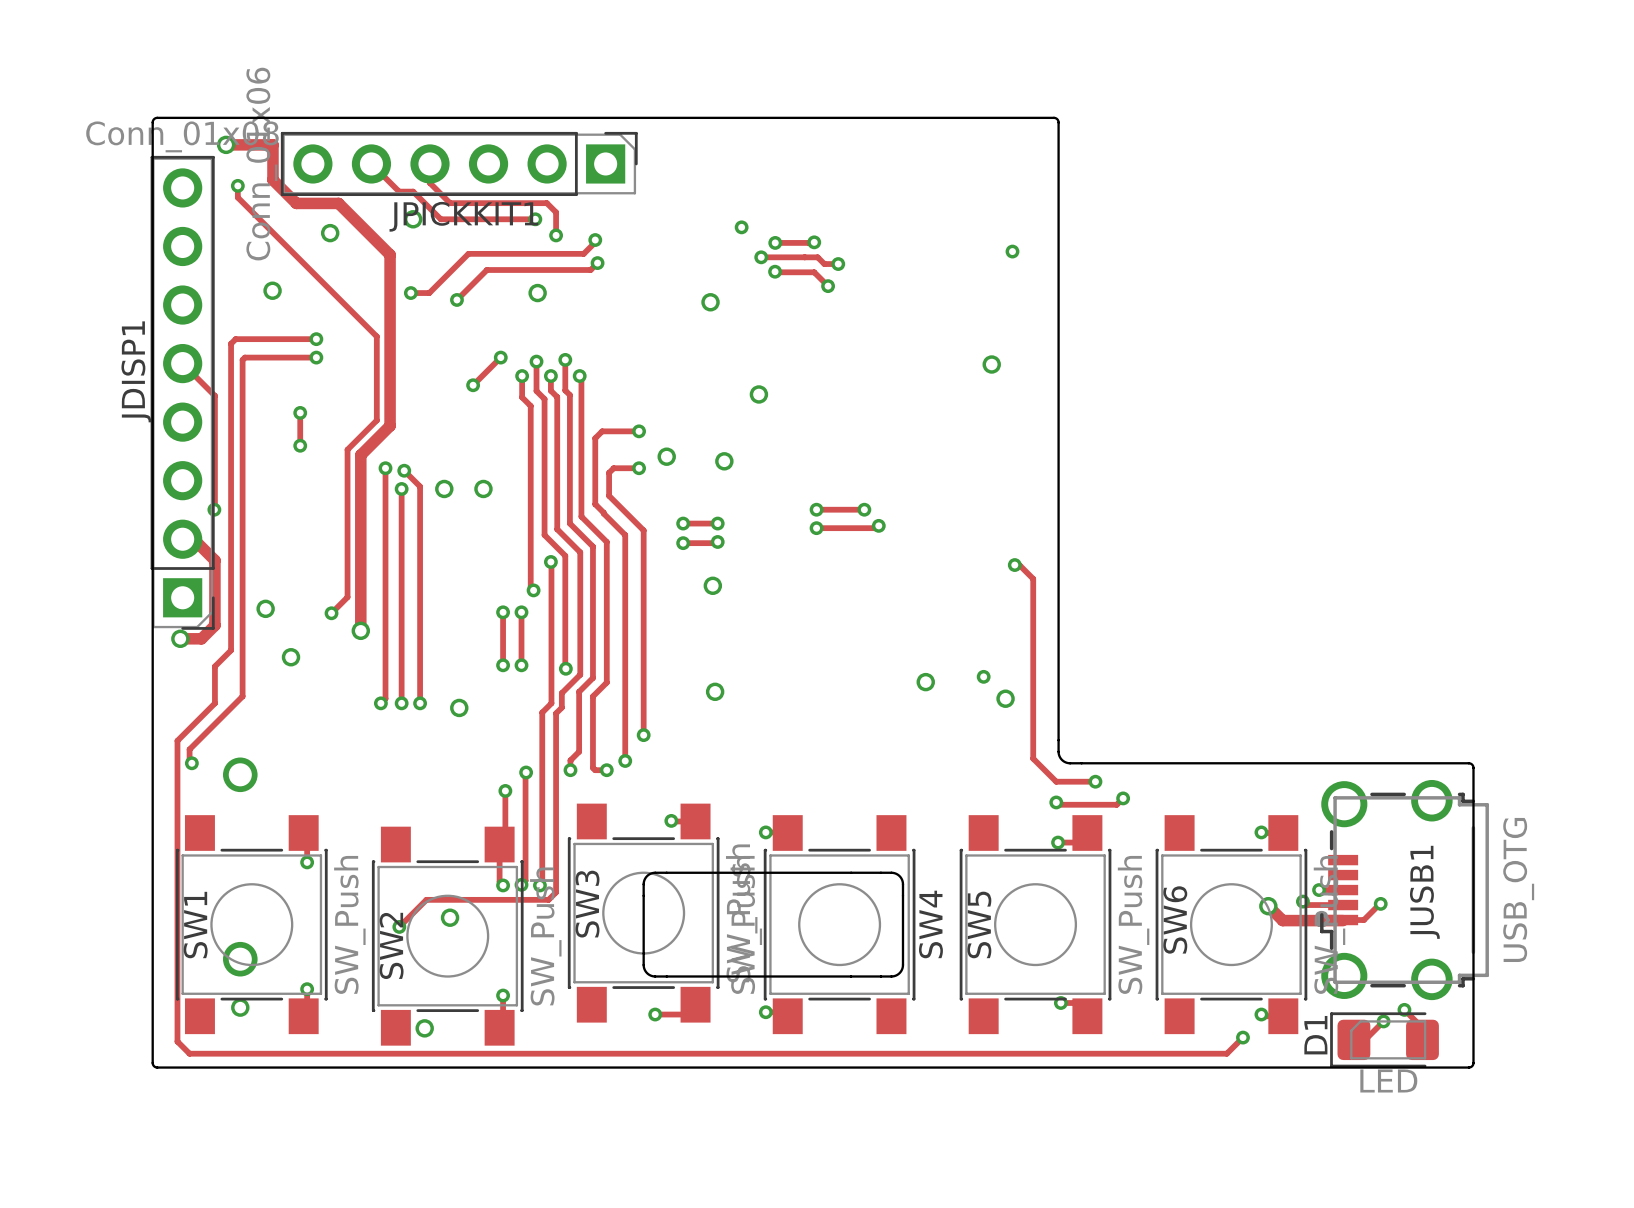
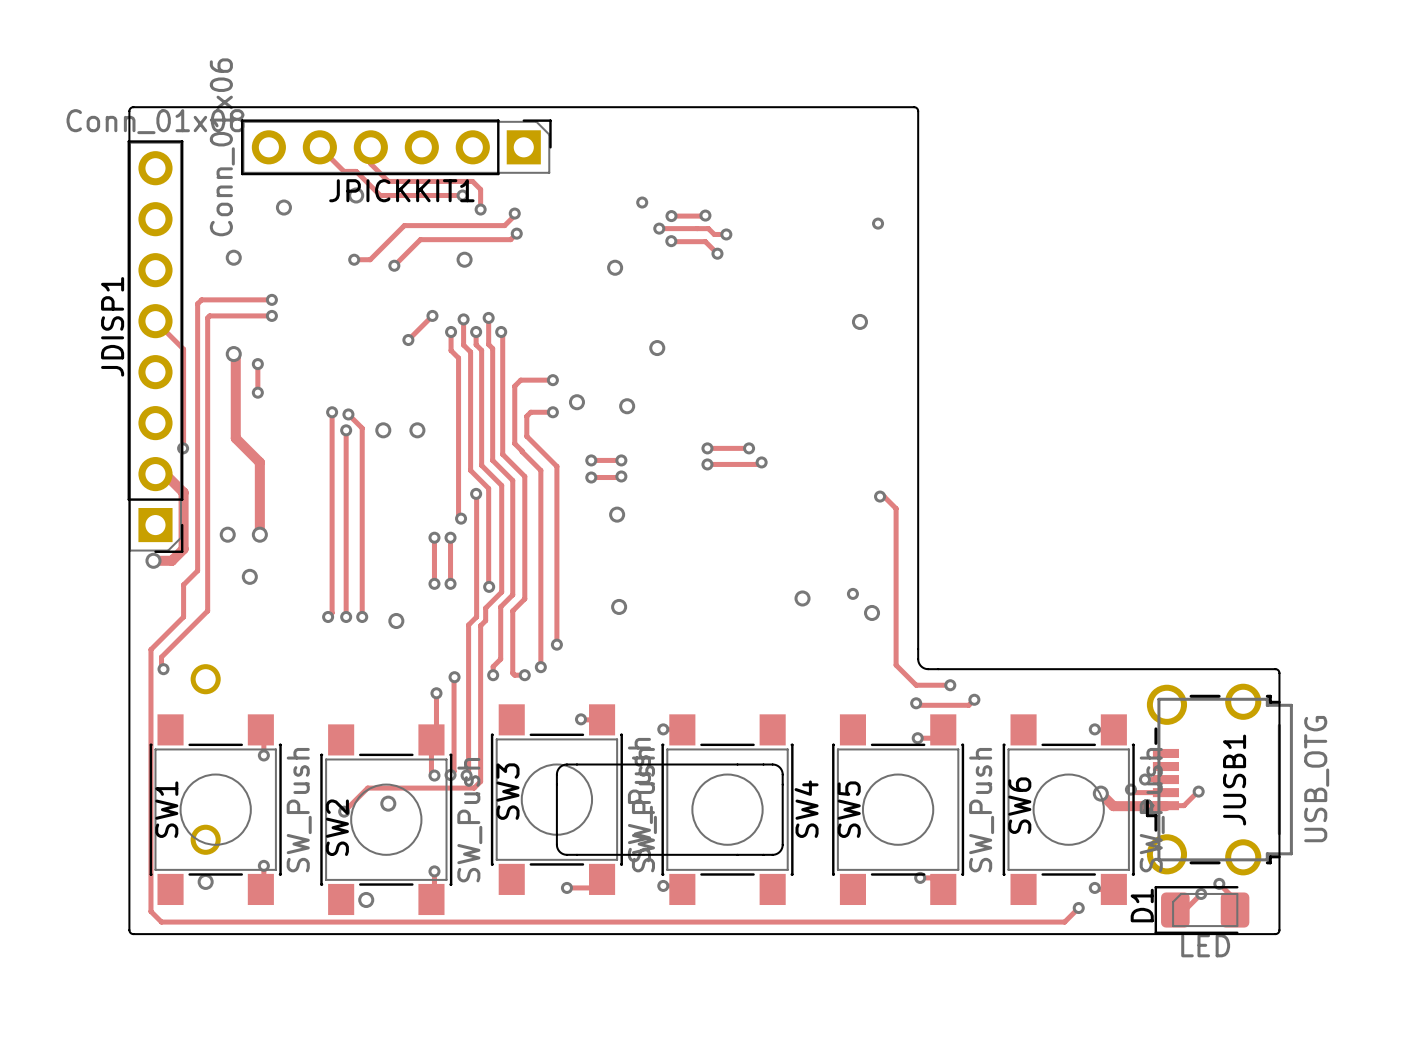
track: (226, 144) (272, 144) (272, 180) (296, 203) (338, 203) (390, 254) (390, 425) (360, 455) (360, 630) -> none
via: (226, 144) -> none
track: (237, 185) (237, 197) (376, 336) (376, 420) (347, 449) (347, 597) (331, 613) -> none
via: (237, 185) -> none
track: none -> (233, 354) (235, 356) (235, 438) (259, 462) (259, 534)
via: none -> (233, 354)
via: (331, 613) -> none
via position: (360, 630) -> (259, 534)

